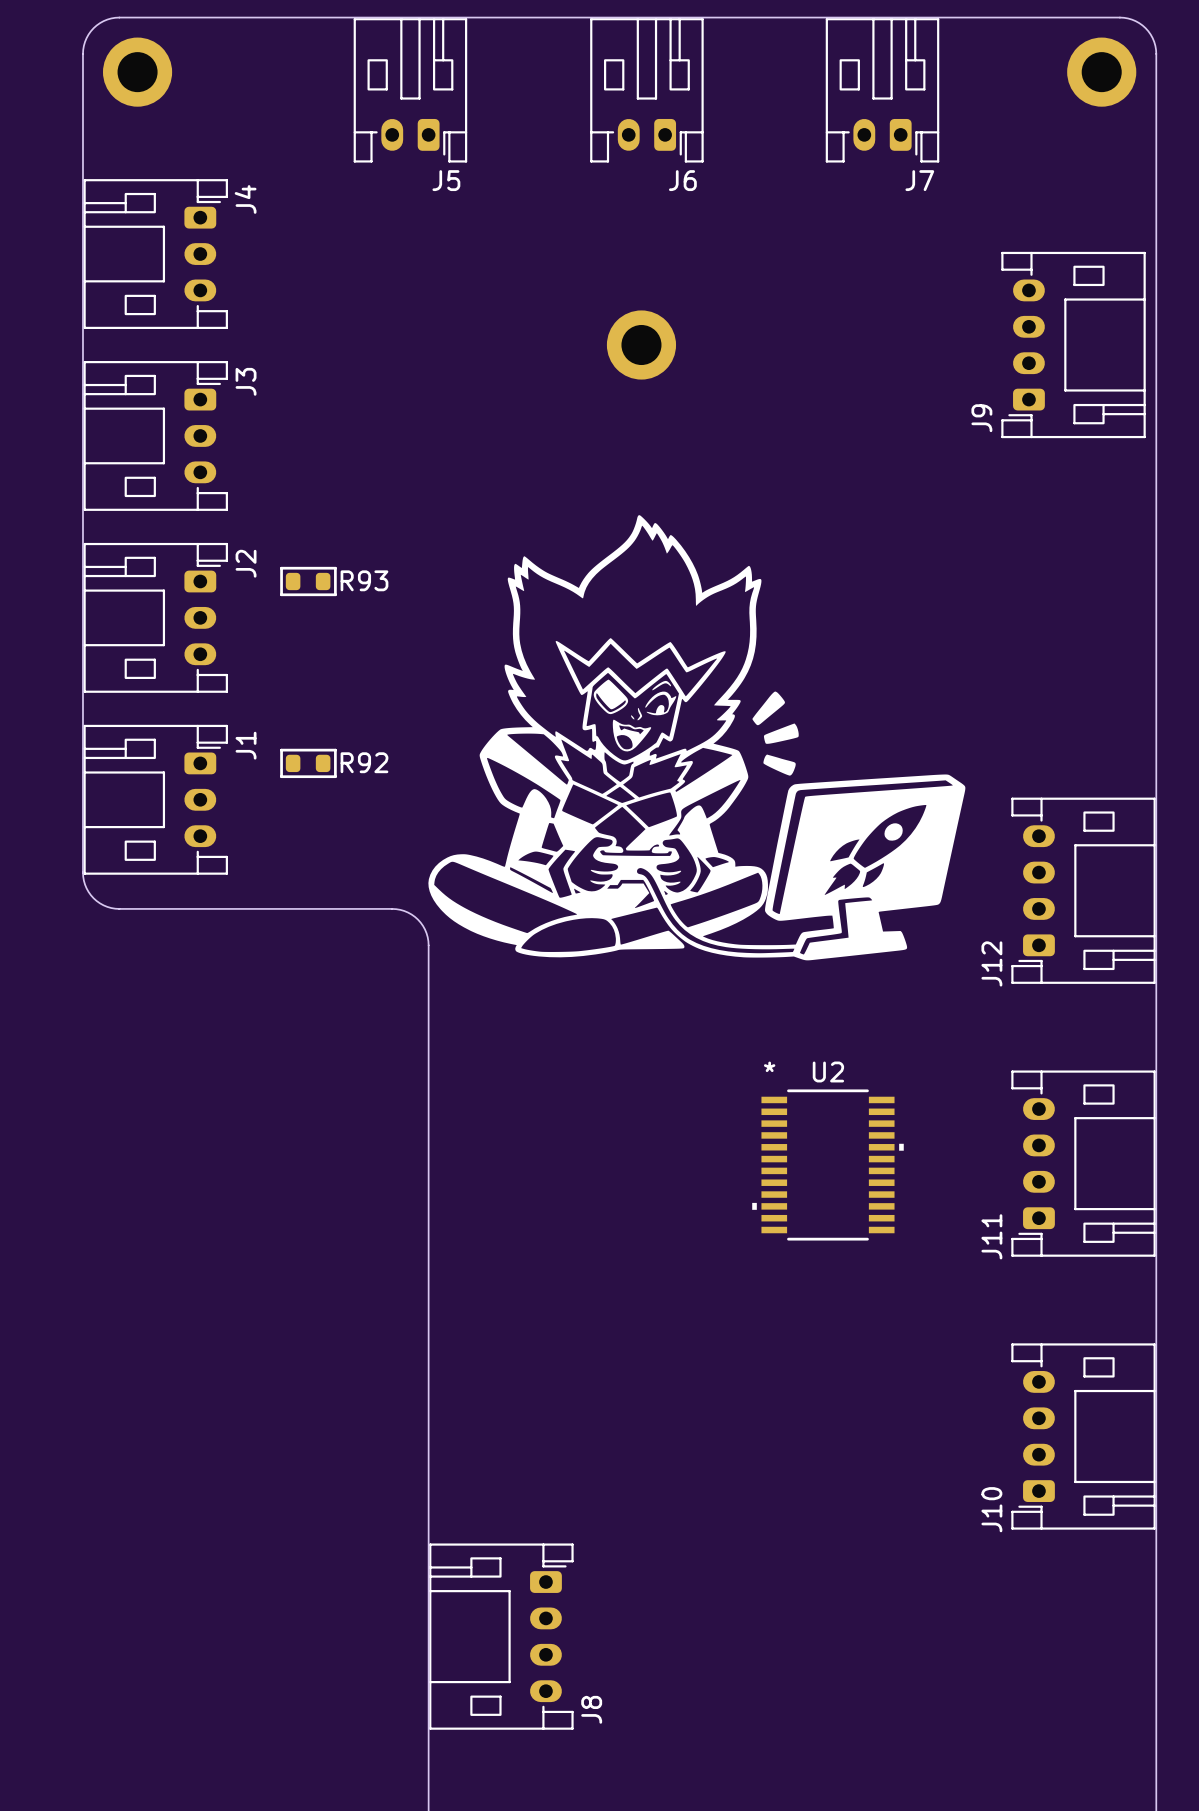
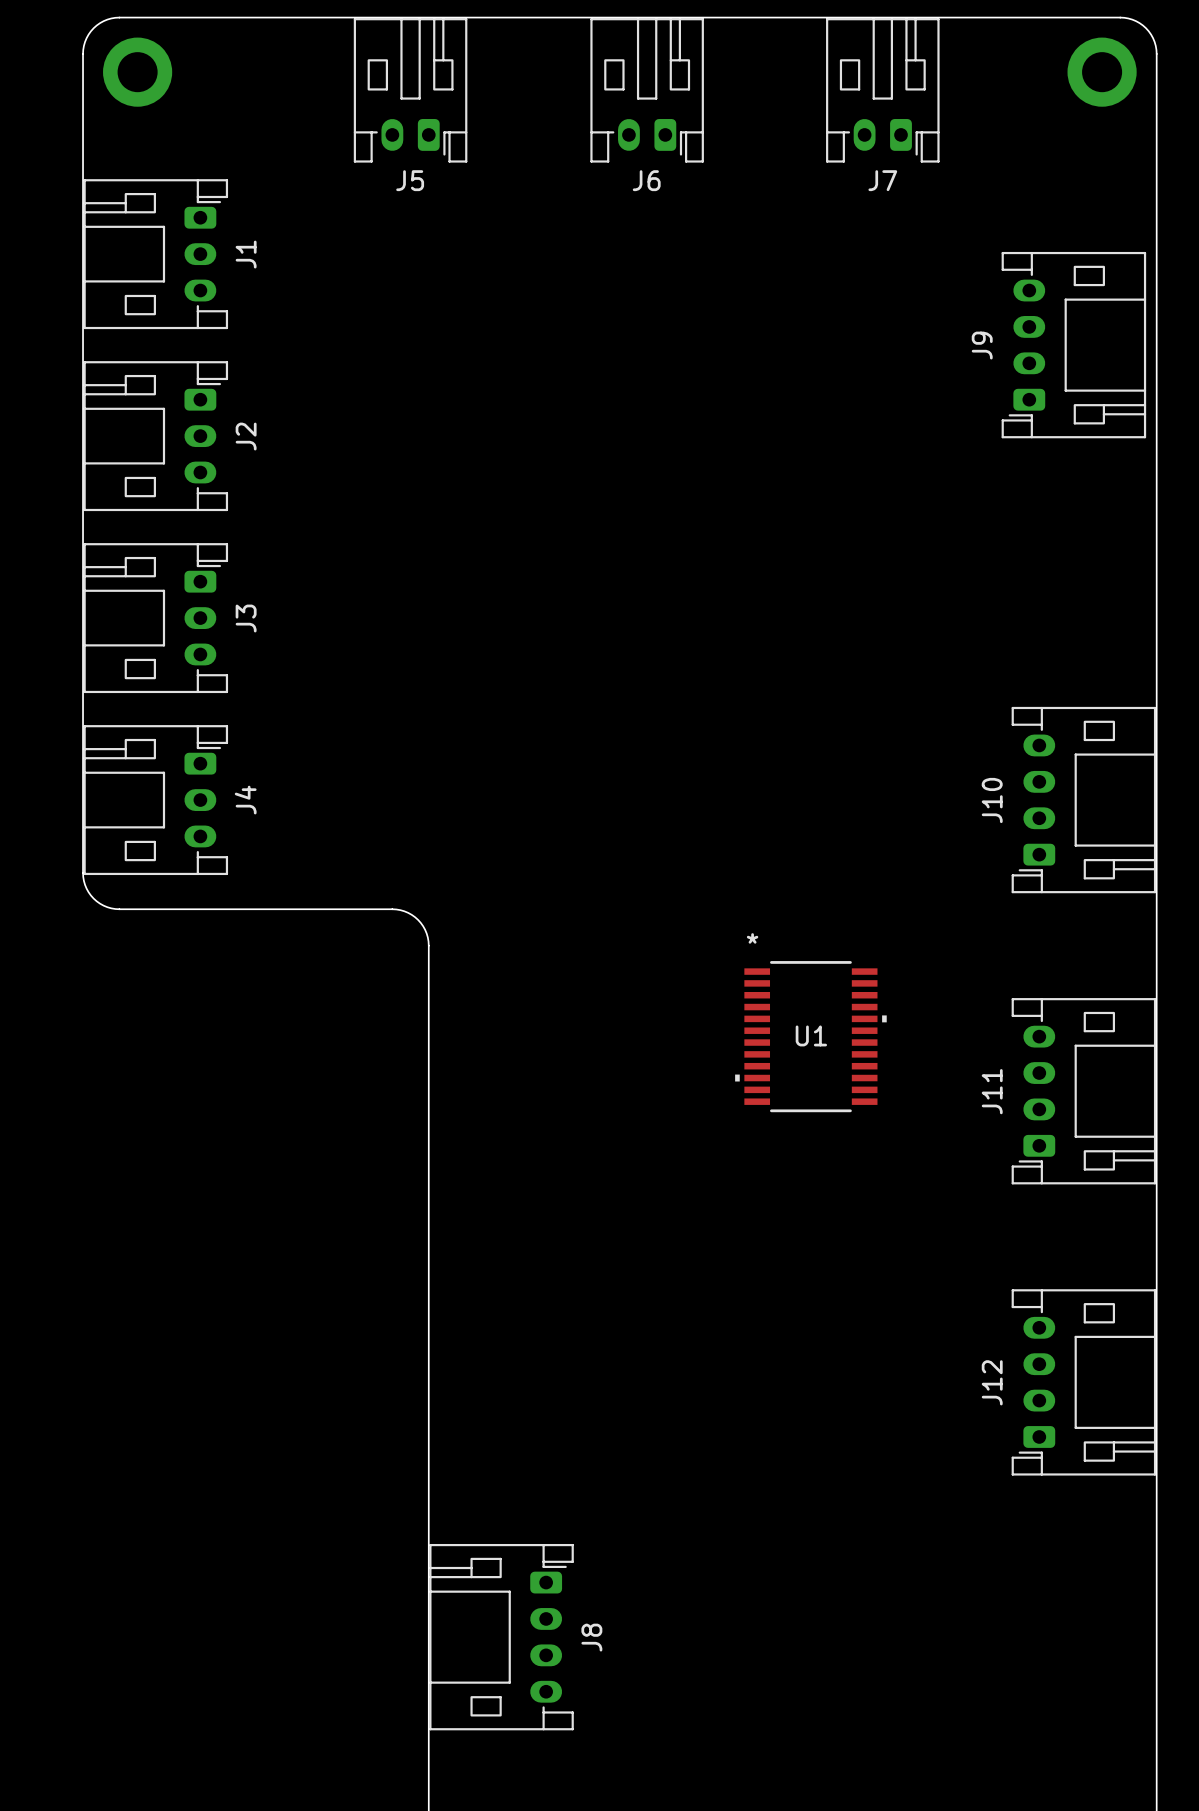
J5 name position: J5 (446, 180) -> J5 (410, 180)
J6 name position: J6 (682, 180) -> J6 (646, 180)
J7 name position: J7 (919, 180) -> J7 (882, 180)
J4 name: J4 (245, 199) -> J1 (246, 254)
part: (641, 345) -> none
J3 name: J3 (246, 381) -> J2 (246, 436)
J9 name position: J9 (981, 418) -> J9 (982, 345)
drawing: [428, 515, 966, 961] -> none
J2 name: J2 (246, 563) -> J3 (246, 618)
R93: (308, 581) -> none
J1 name: J1 (246, 745) -> J4 (245, 800)
R92: (308, 763) -> none
J12 position: (1083, 890) -> (1083, 1382)
J12 name position: J12 (991, 963) -> J12 (992, 1382)
U1: none -> (810, 1036)
J11 position: (1083, 1163) -> (1083, 1091)
U2: (827, 1164) -> none
J11 name position: J11 (991, 1236) -> J11 (992, 1091)
J10 position: (1083, 1436) -> (1083, 800)
J10 name position: J10 (991, 1509) -> J10 (992, 800)
J8 name position: J8 (591, 1709) -> J8 (591, 1637)

